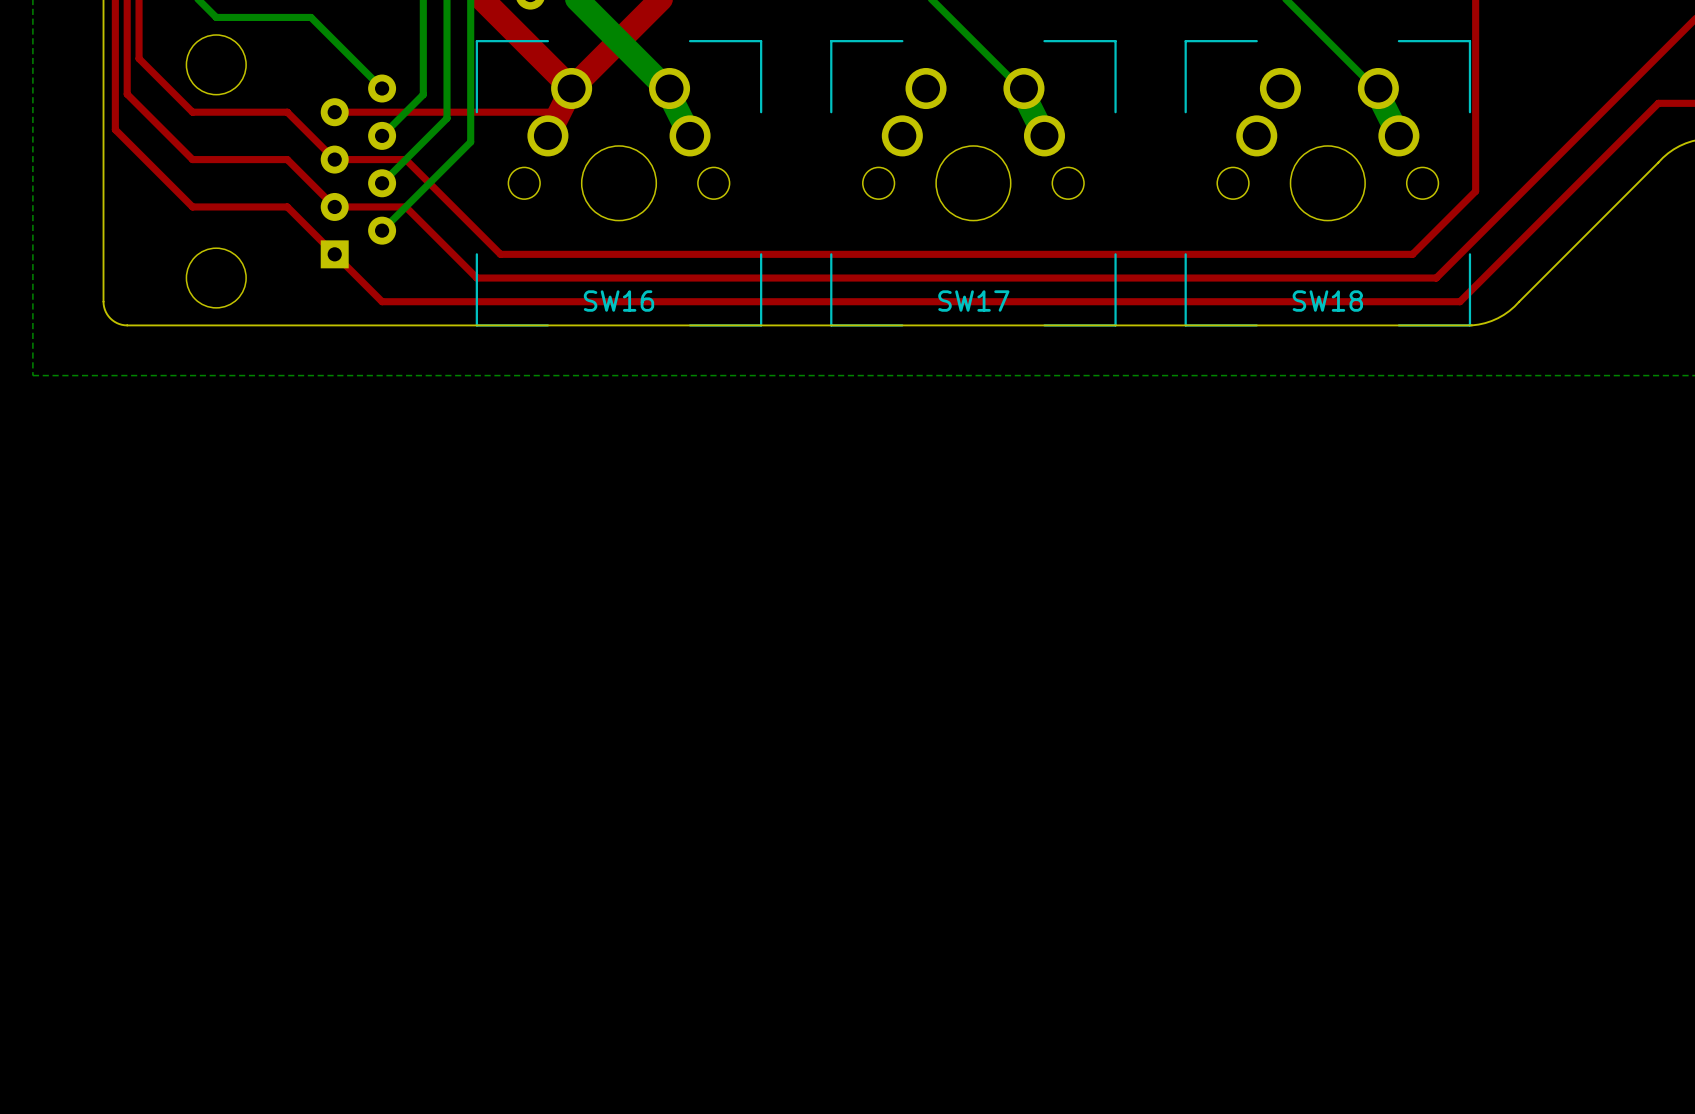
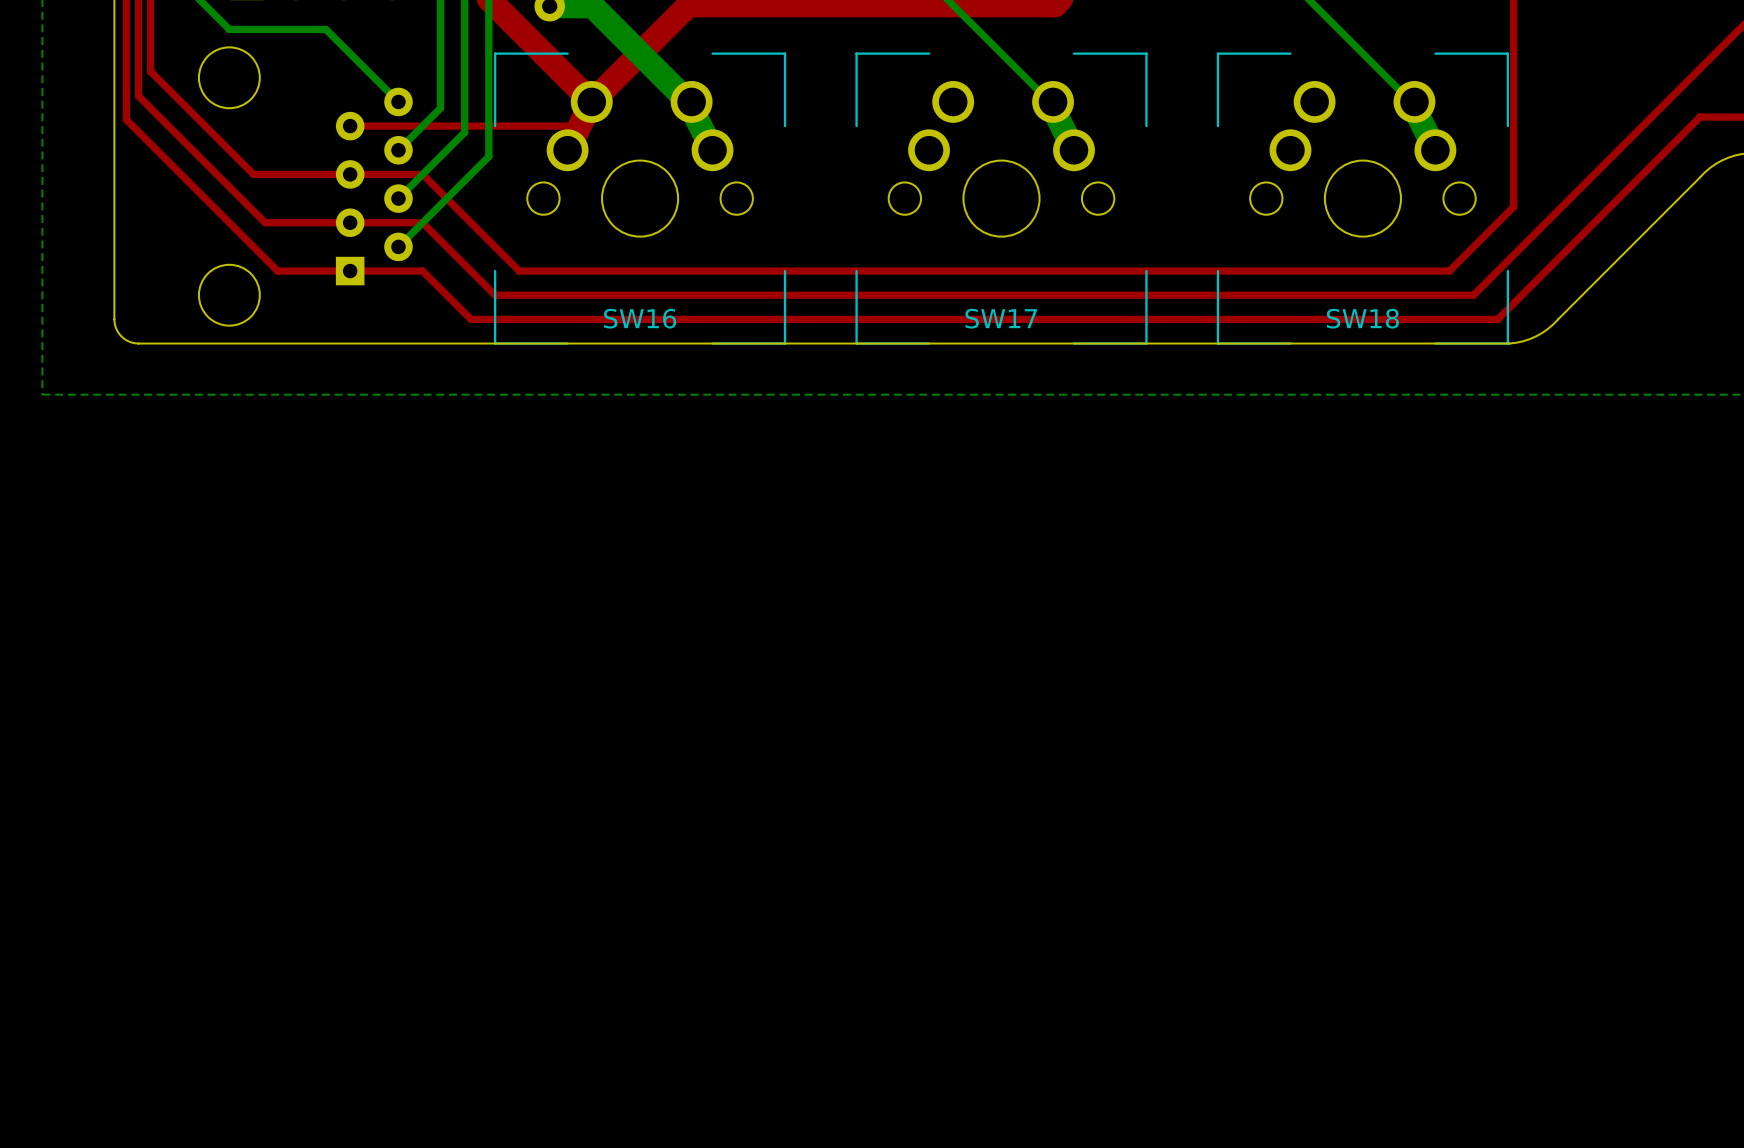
top track: (127, 82) (127, 94) (192, 159) (239, 159) -> (205, 126) (253, 174)
top track: (115, 106) (115, 129) (192, 206) (251, 206) -> (138, 96) (265, 222)
top track: none -> (126, 119) (277, 271) (422, 271) (470, 319)
top track: (192, 112) (287, 112) (334, 159) -> none
top track: (287, 159) (334, 206) -> (301, 174) (350, 174)
top track: (287, 206) (382, 301) (453, 301) -> (301, 222) (350, 222)

